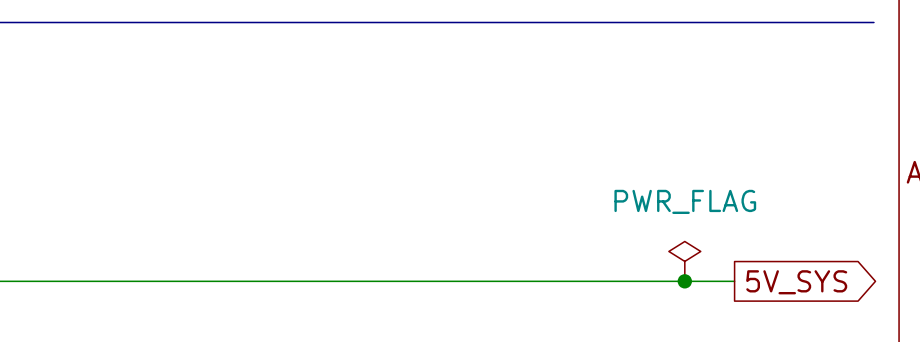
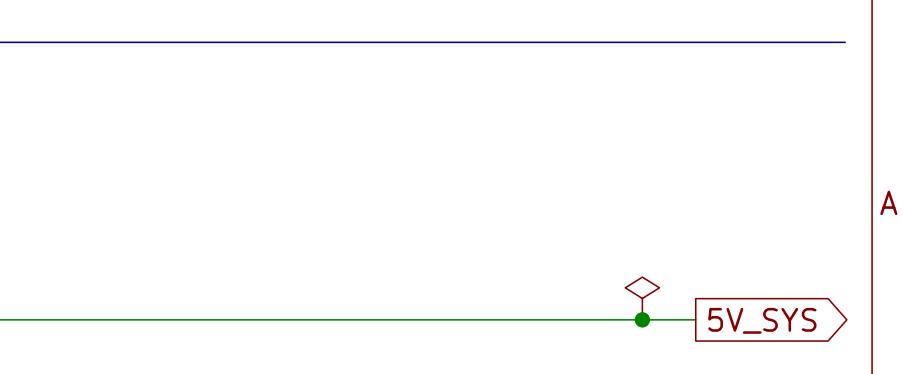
power symbol text: PWR_FLAG (685, 201) -> none

